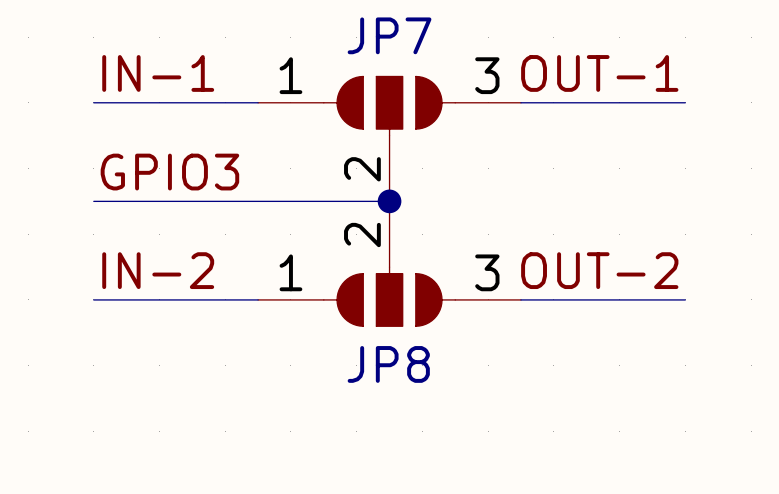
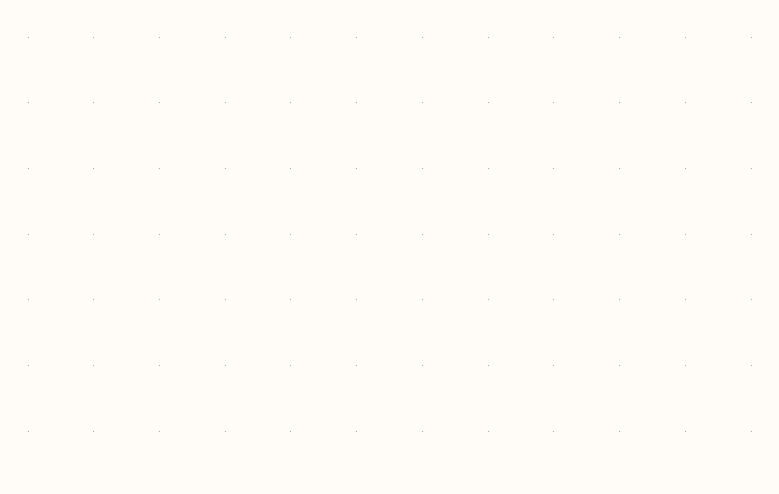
label: IN-1 (158, 73) -> none
label: OUT-1 (599, 73) -> none
wire: (93, 102) (258, 102) -> none
wire: (520, 102) (685, 102) -> none
JP7: (389, 138) -> none
label: GPIO3 (169, 172) -> none
wire: (93, 201) (389, 201) -> none
junction: (389, 201) -> none
JP8: (389, 263) -> none
label: IN-2 (158, 270) -> none
label: OUT-2 (599, 270) -> none
wire: (93, 299) (258, 299) -> none
wire: (520, 299) (685, 299) -> none

